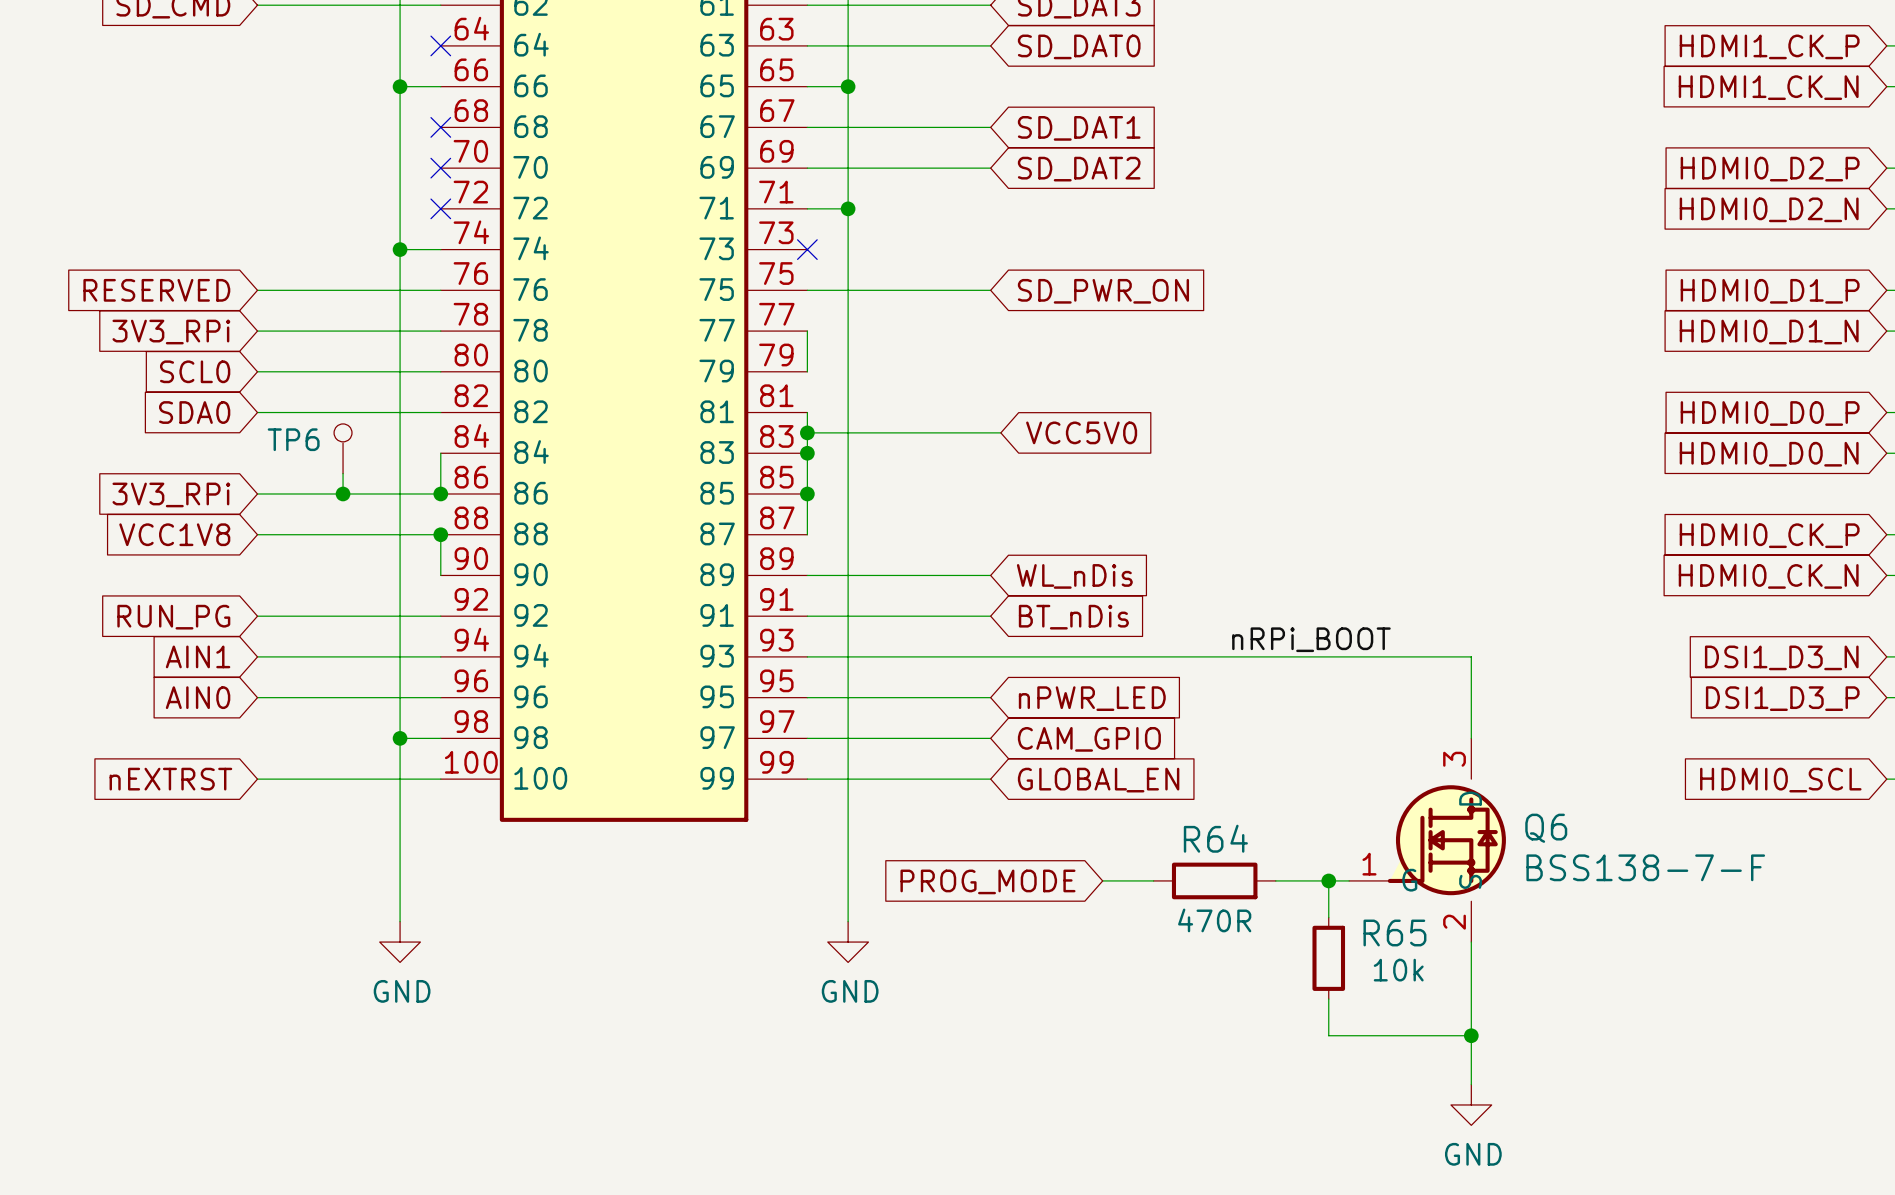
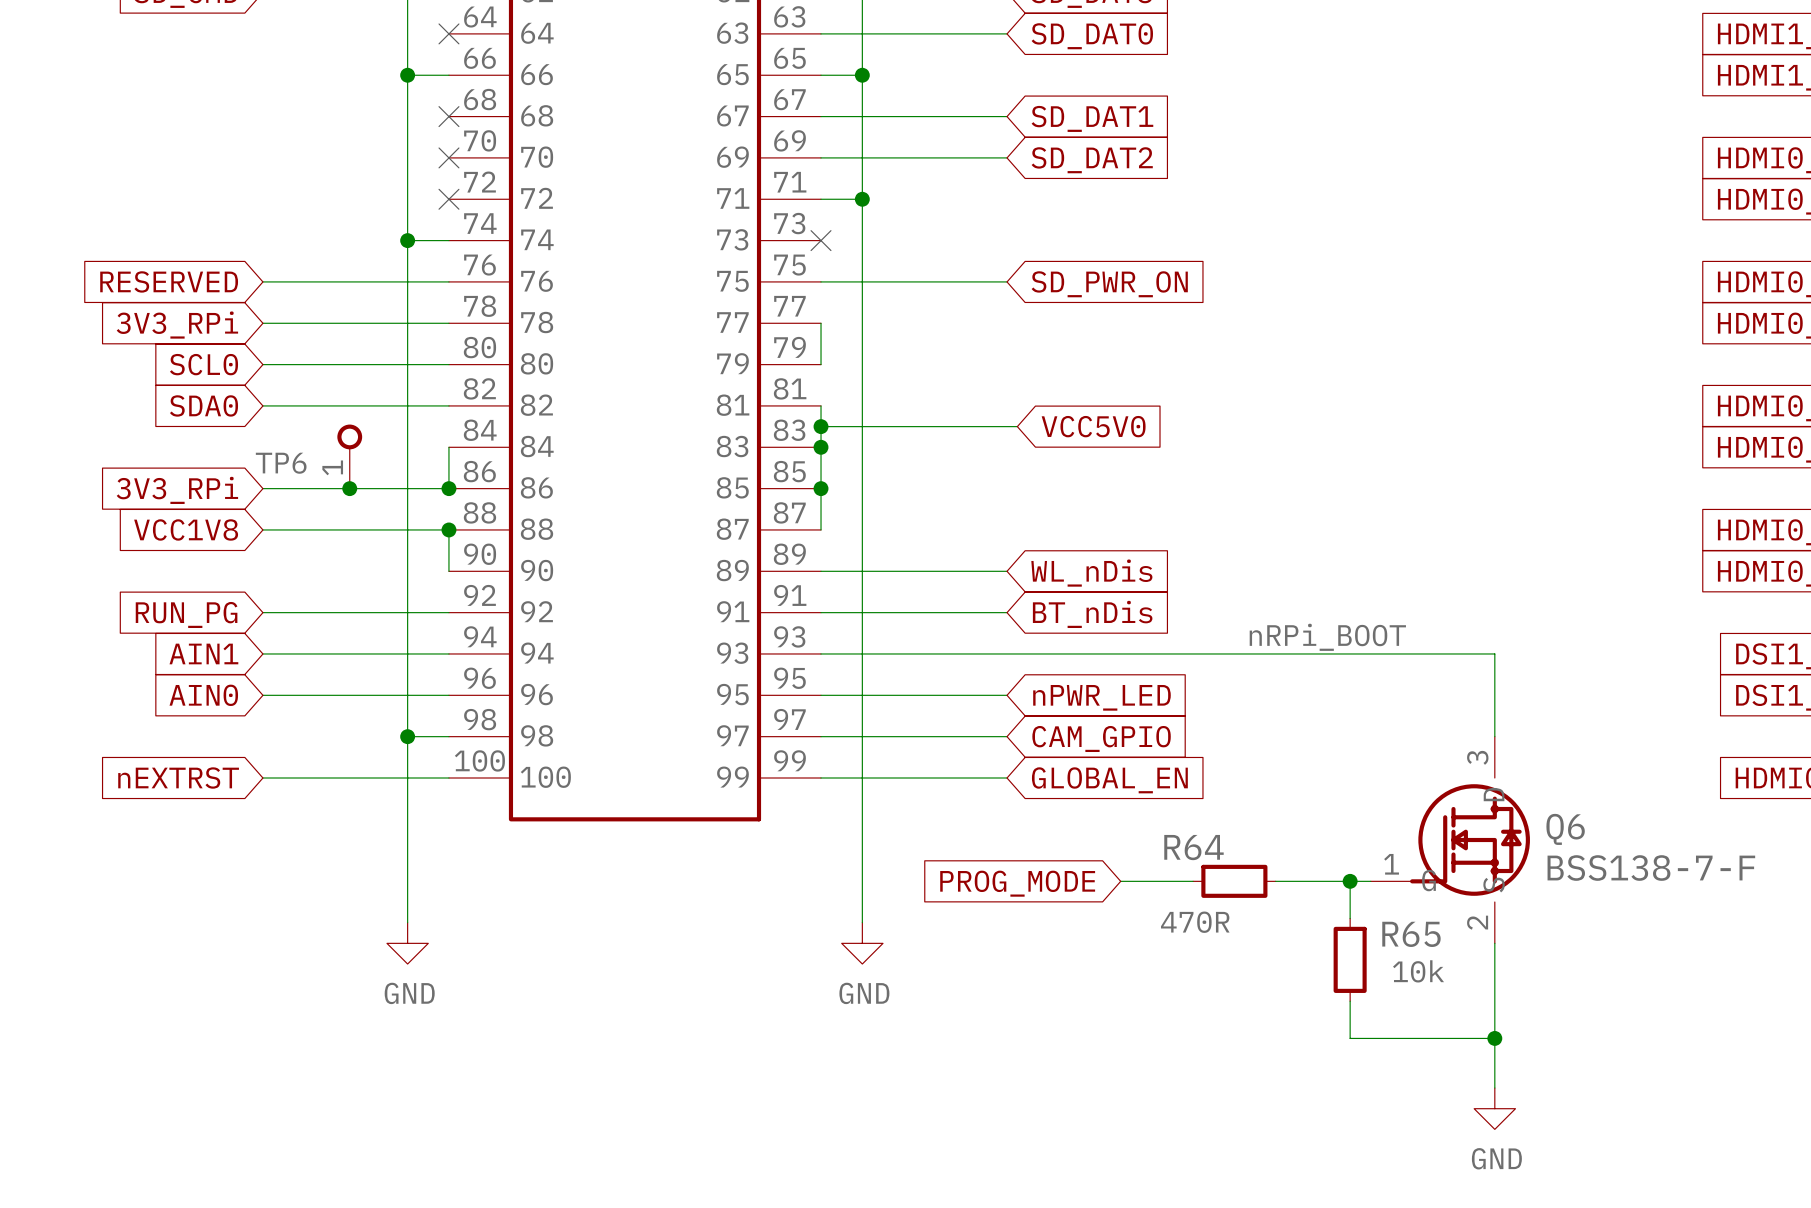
TP6 symbol: [334, 423, 352, 474] -> [337, 424, 363, 489]
R64 name position: R64 (1215, 838) -> R64 (1193, 847)
R64 symbol: [1153, 862, 1276, 900] -> [1193, 864, 1276, 898]

